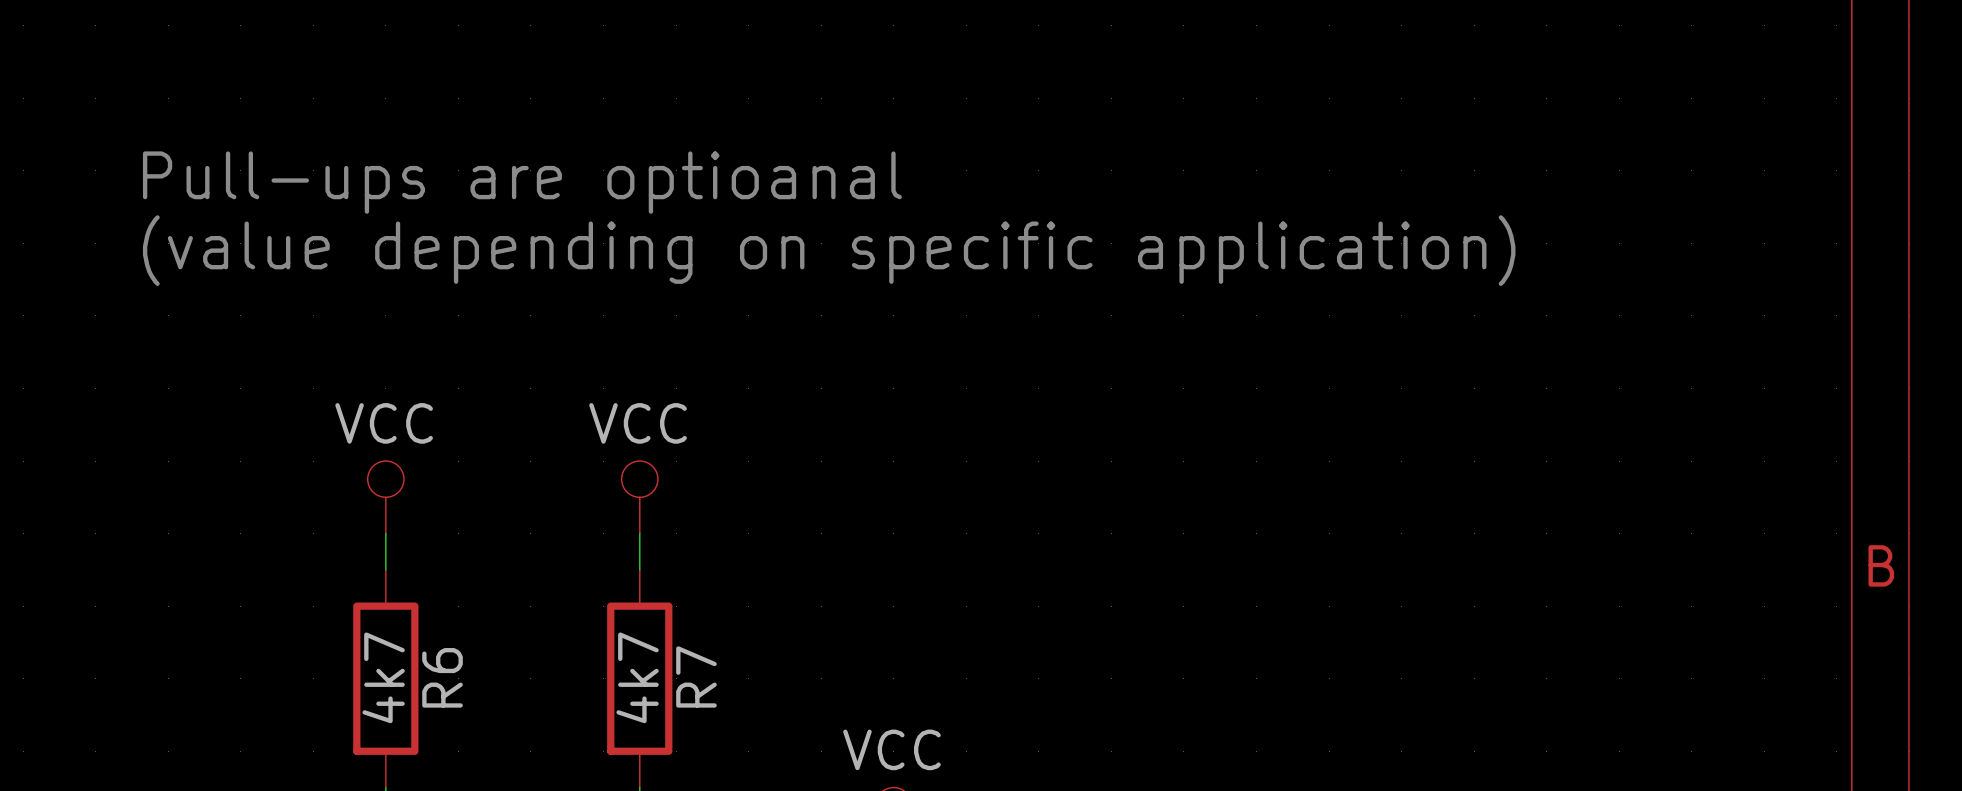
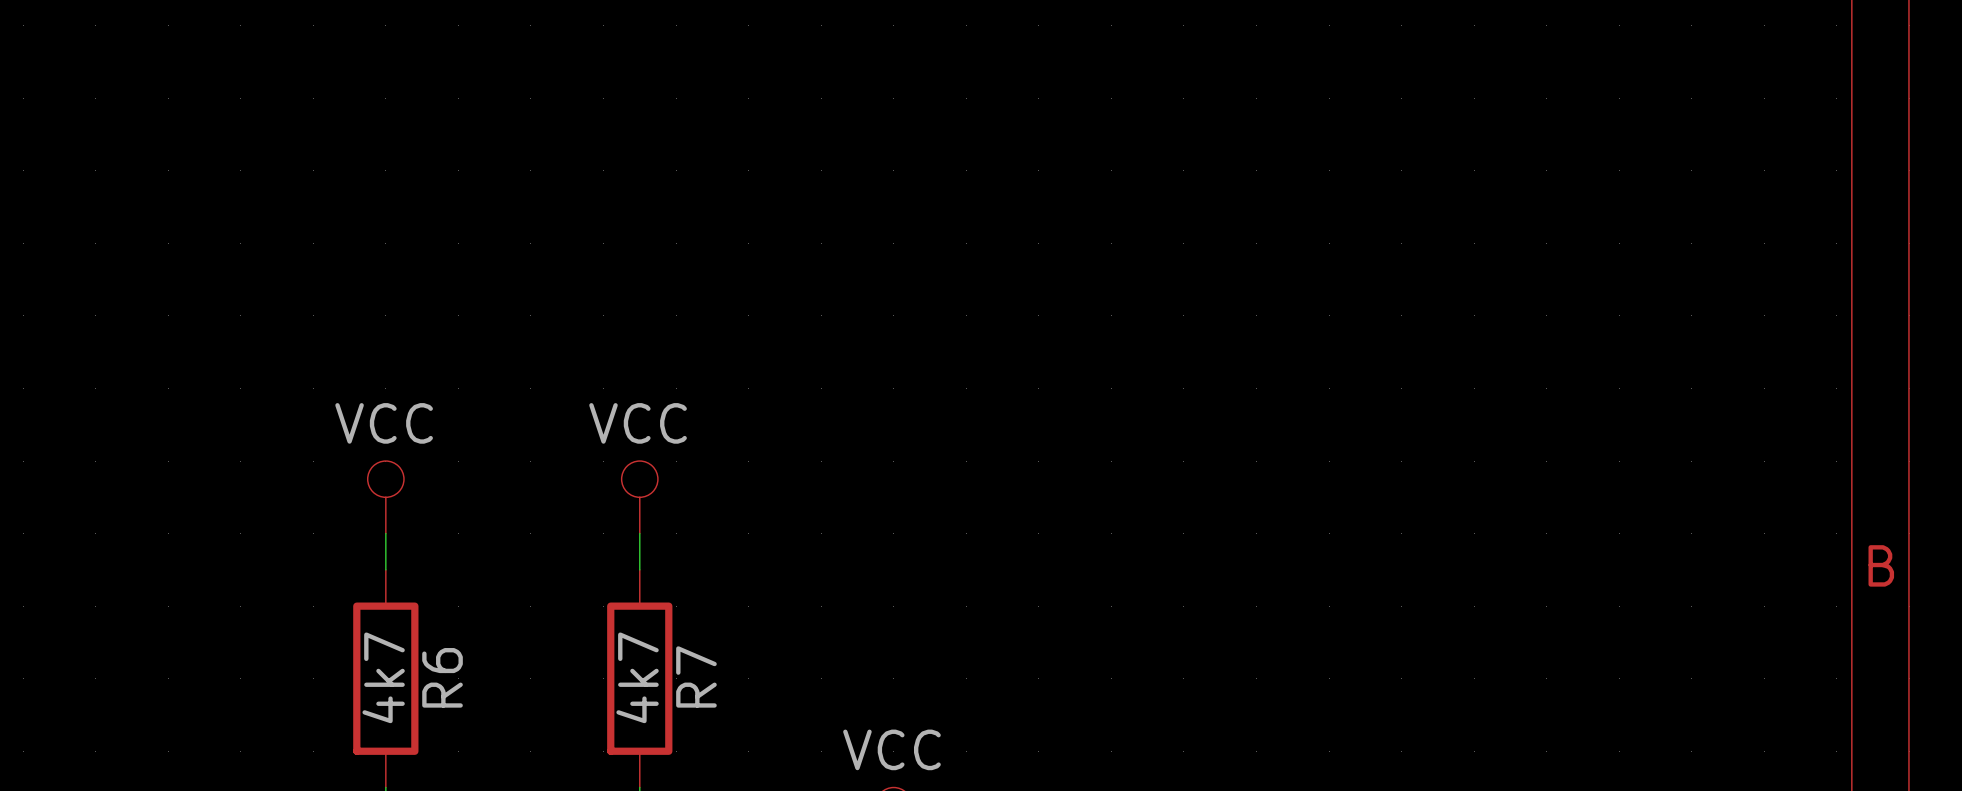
text: Pull-ups are optioanal (522, 182) -> none
text: (value depending on specific application) (829, 250) -> none

